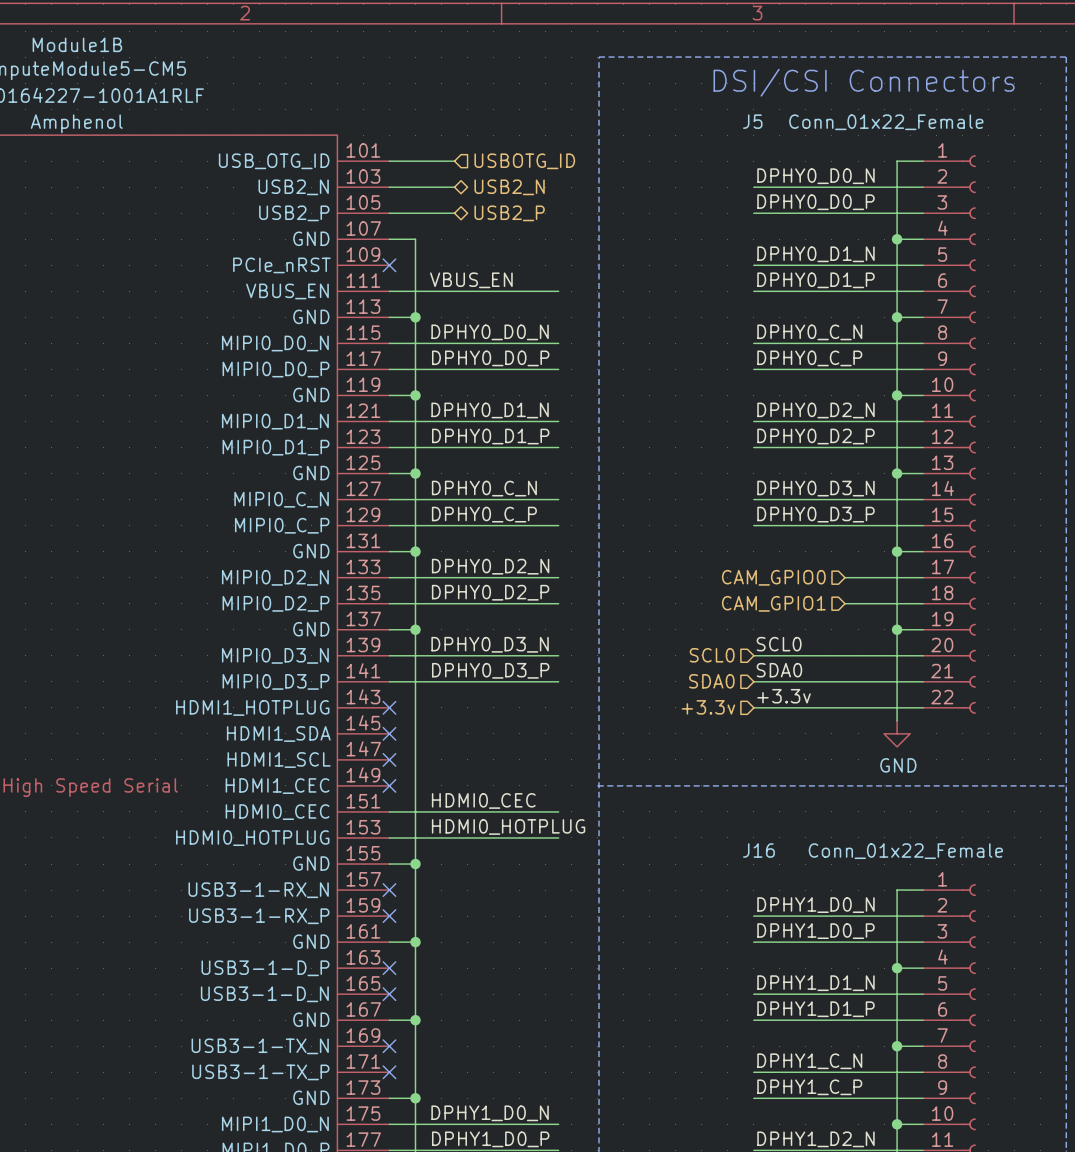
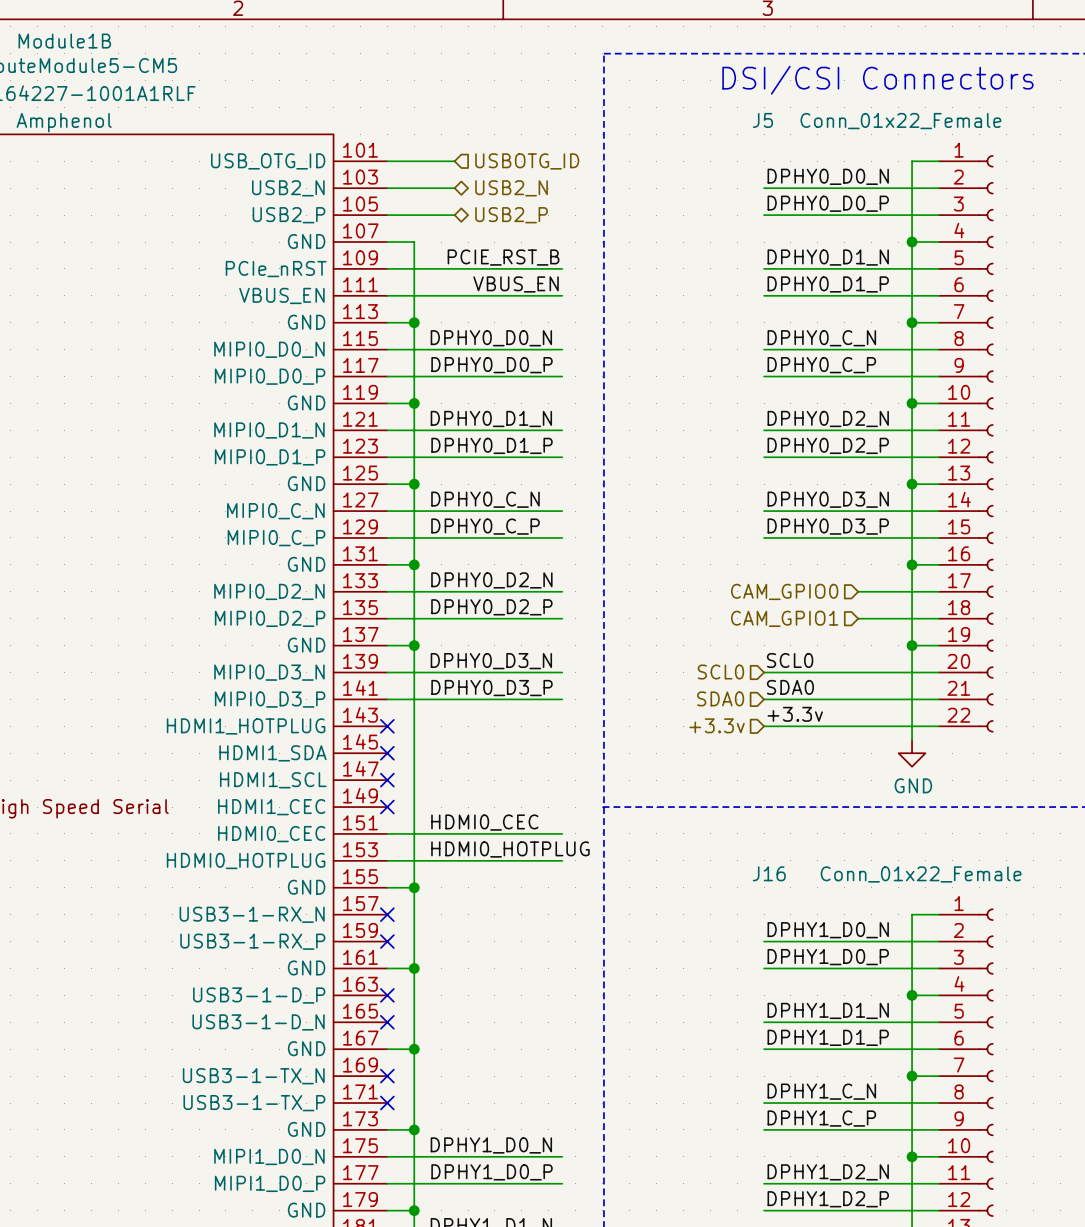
label: none -> PCIE_RST_B (503, 257)
wire: none -> (387, 268) (562, 268)
no-connect mark: (389, 265) -> none
label position: VBUS_EN (471, 280) -> VBUS_EN (516, 284)

